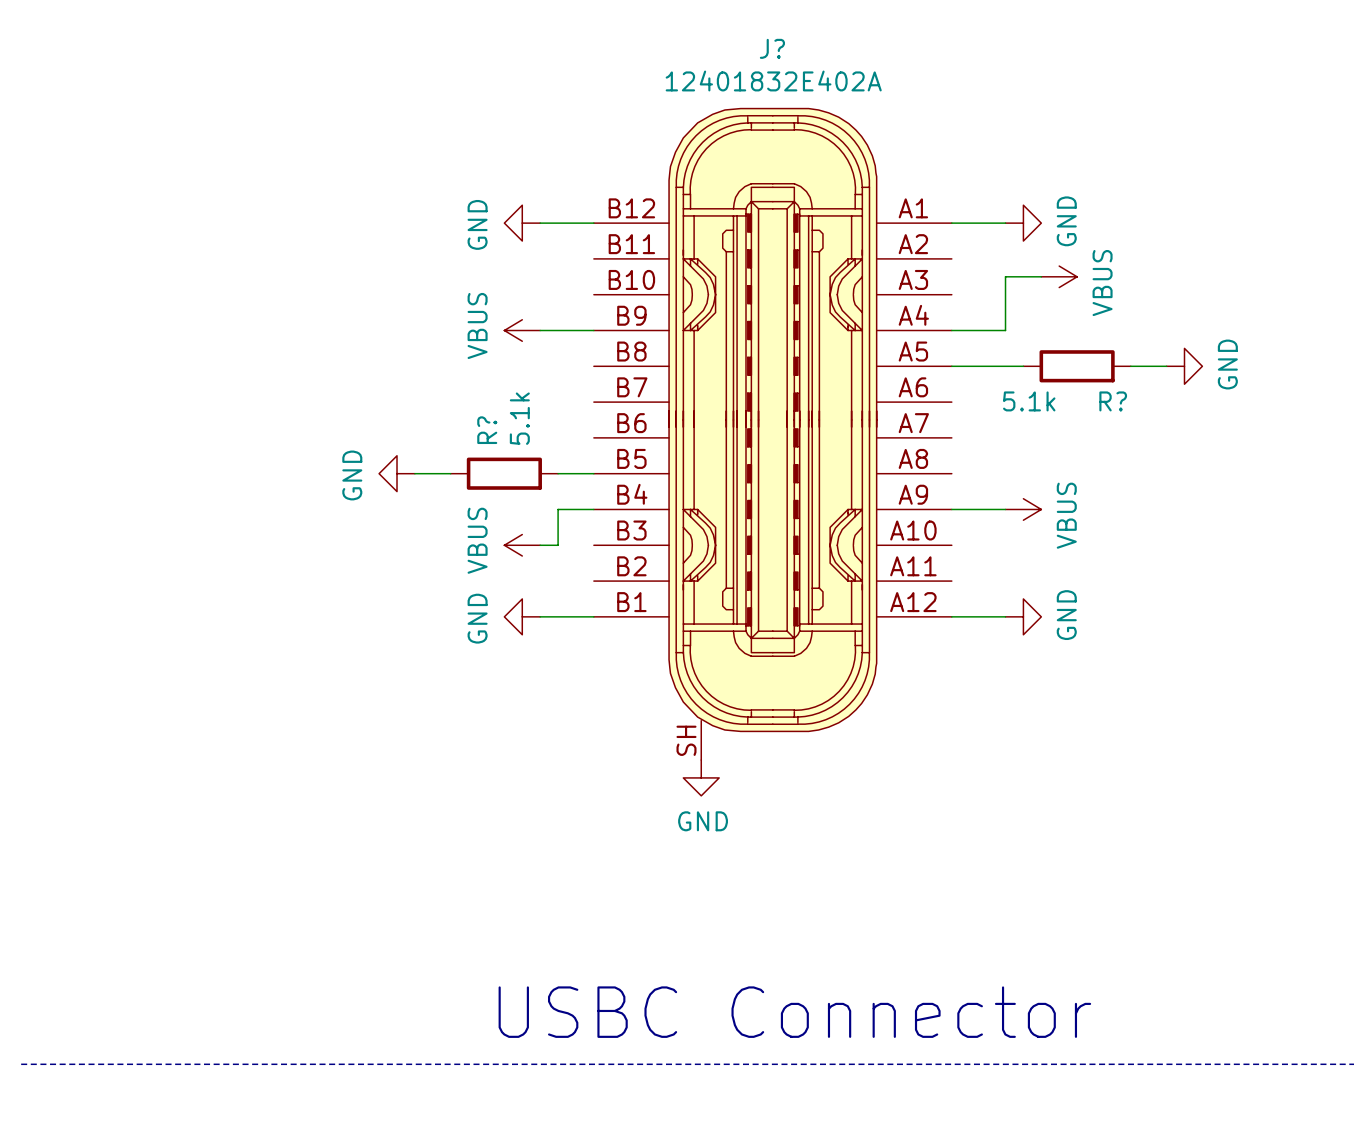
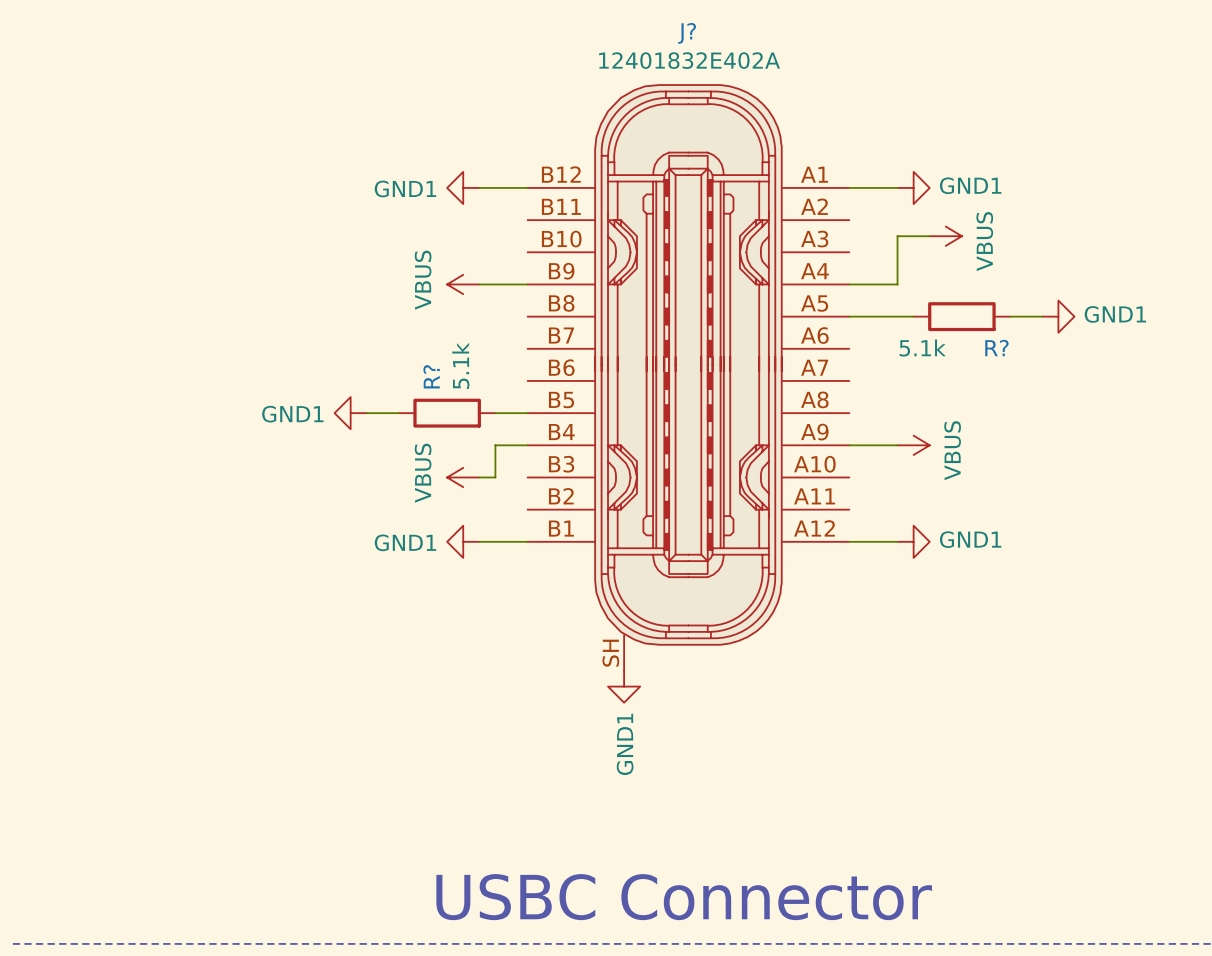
power symbol: GND (522, 223) -> GND1 (463, 187)
power symbol: GND (1023, 223) -> GND1 (913, 187)
power symbol: GND (1184, 366) -> GND1 (1058, 316)
power symbol: GND (397, 473) -> GND1 (350, 413)
power symbol: GND (522, 616) -> GND1 (463, 541)
power symbol: GND (1023, 616) -> GND1 (913, 541)
power symbol: GND (701, 777) -> GND1 (624, 686)

